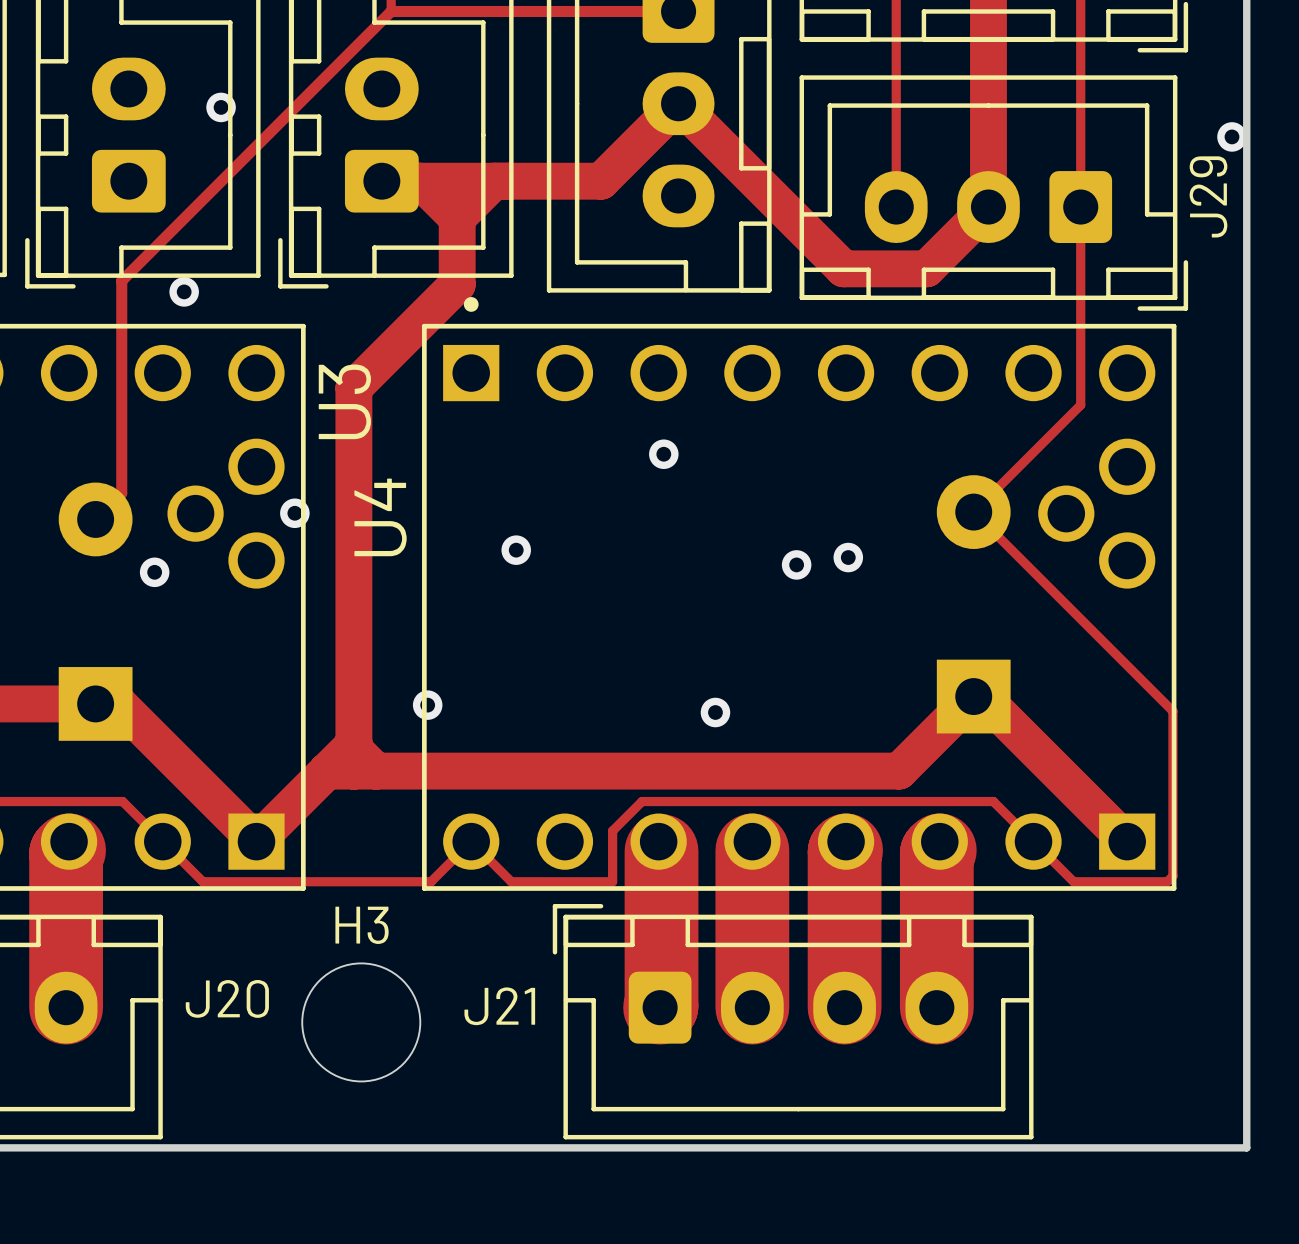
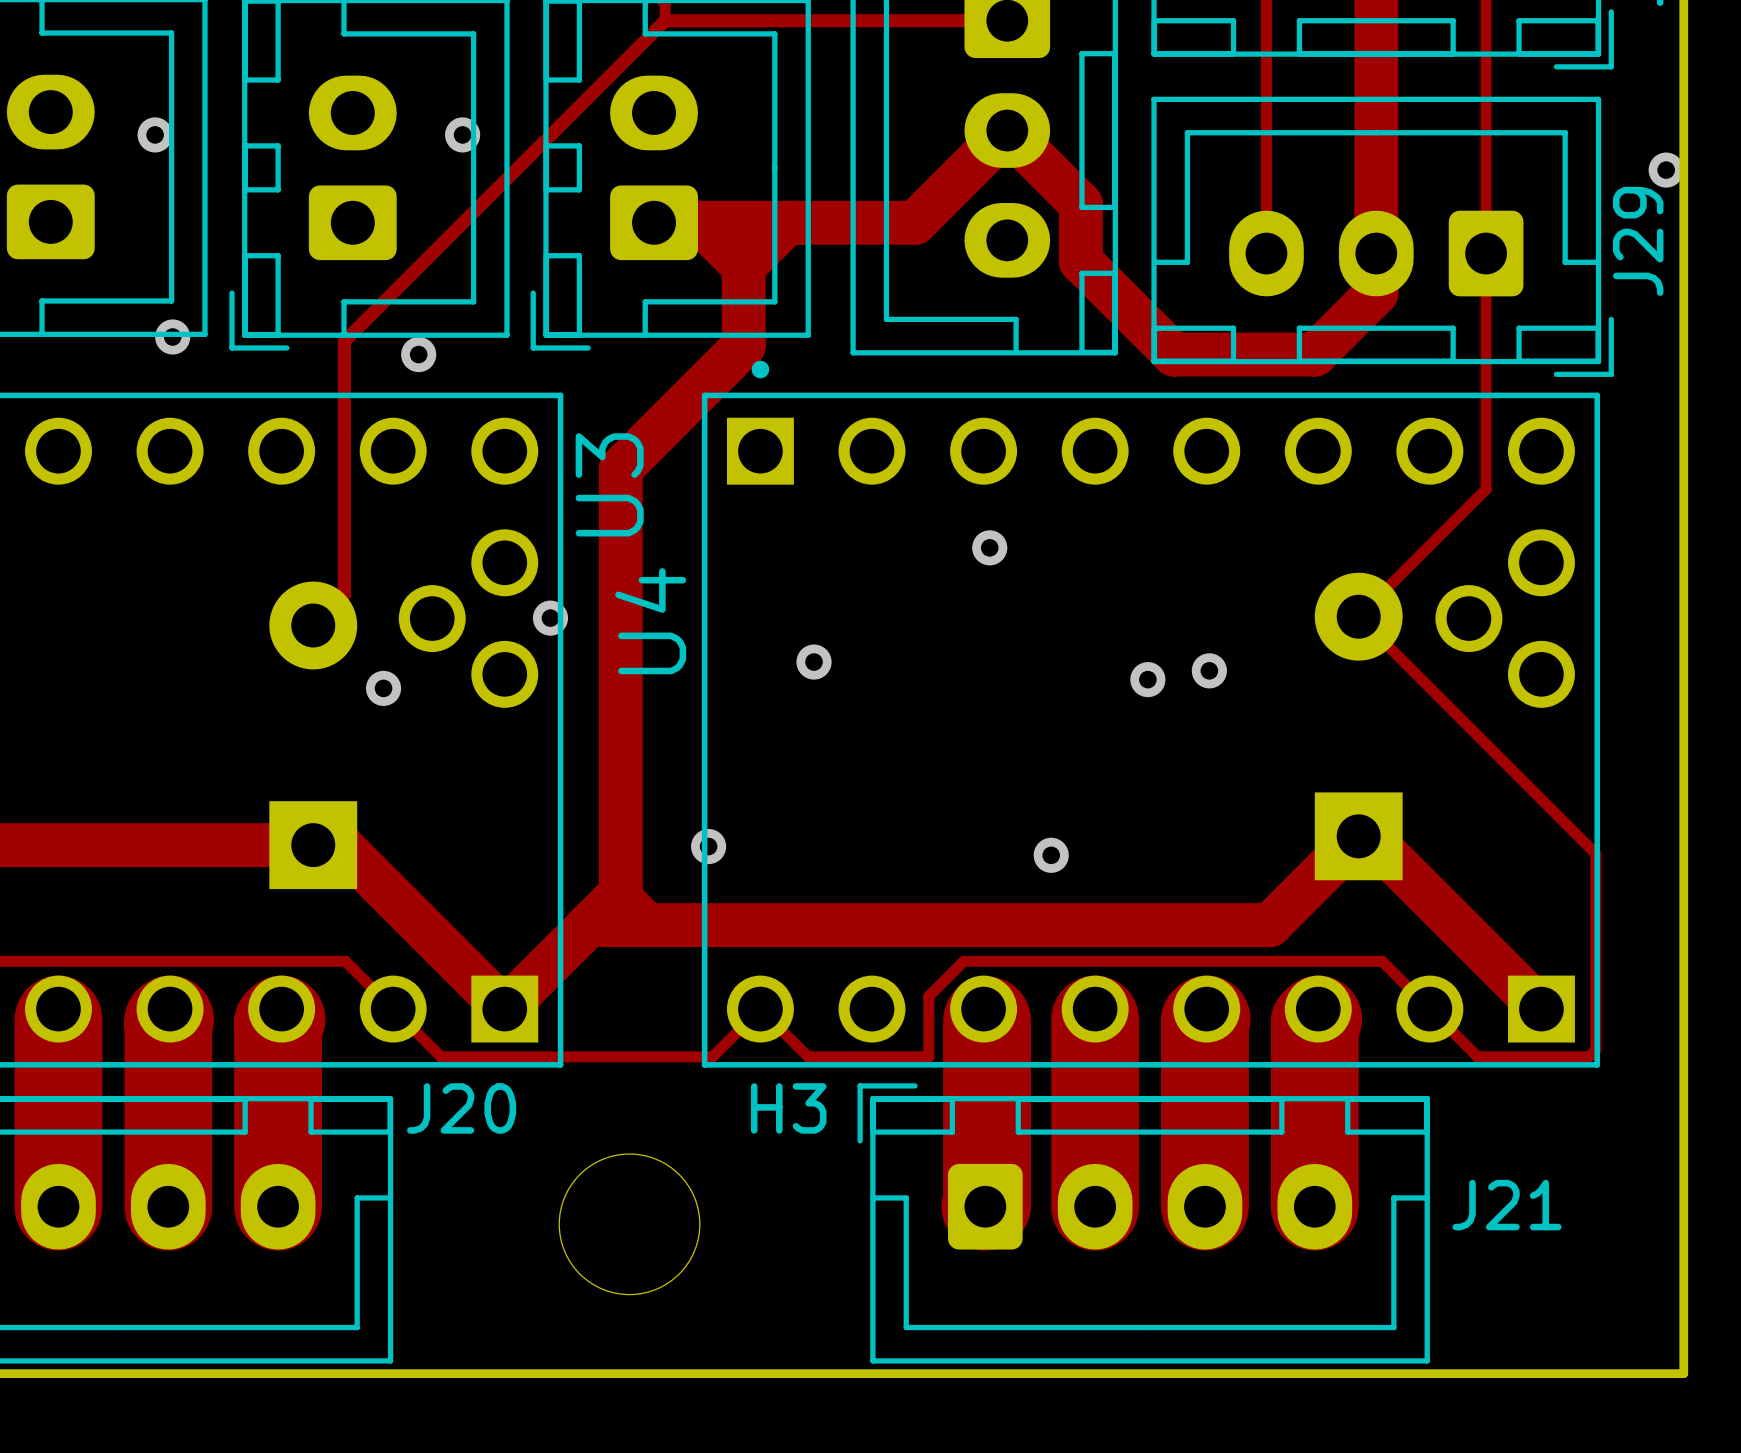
track: (740, 165) (843, 268) (926, 268) (988, 207) -> (1080, 204) (1080, 261) (1174, 354) (1314, 354) (1376, 293) (1376, 253)
H3 name position: H3 (362, 925) -> H3 (788, 1108)
J20 name position: J20 (227, 998) -> J20 (461, 1108)
J21 name position: J21 (499, 1006) -> J21 (1507, 1205)

